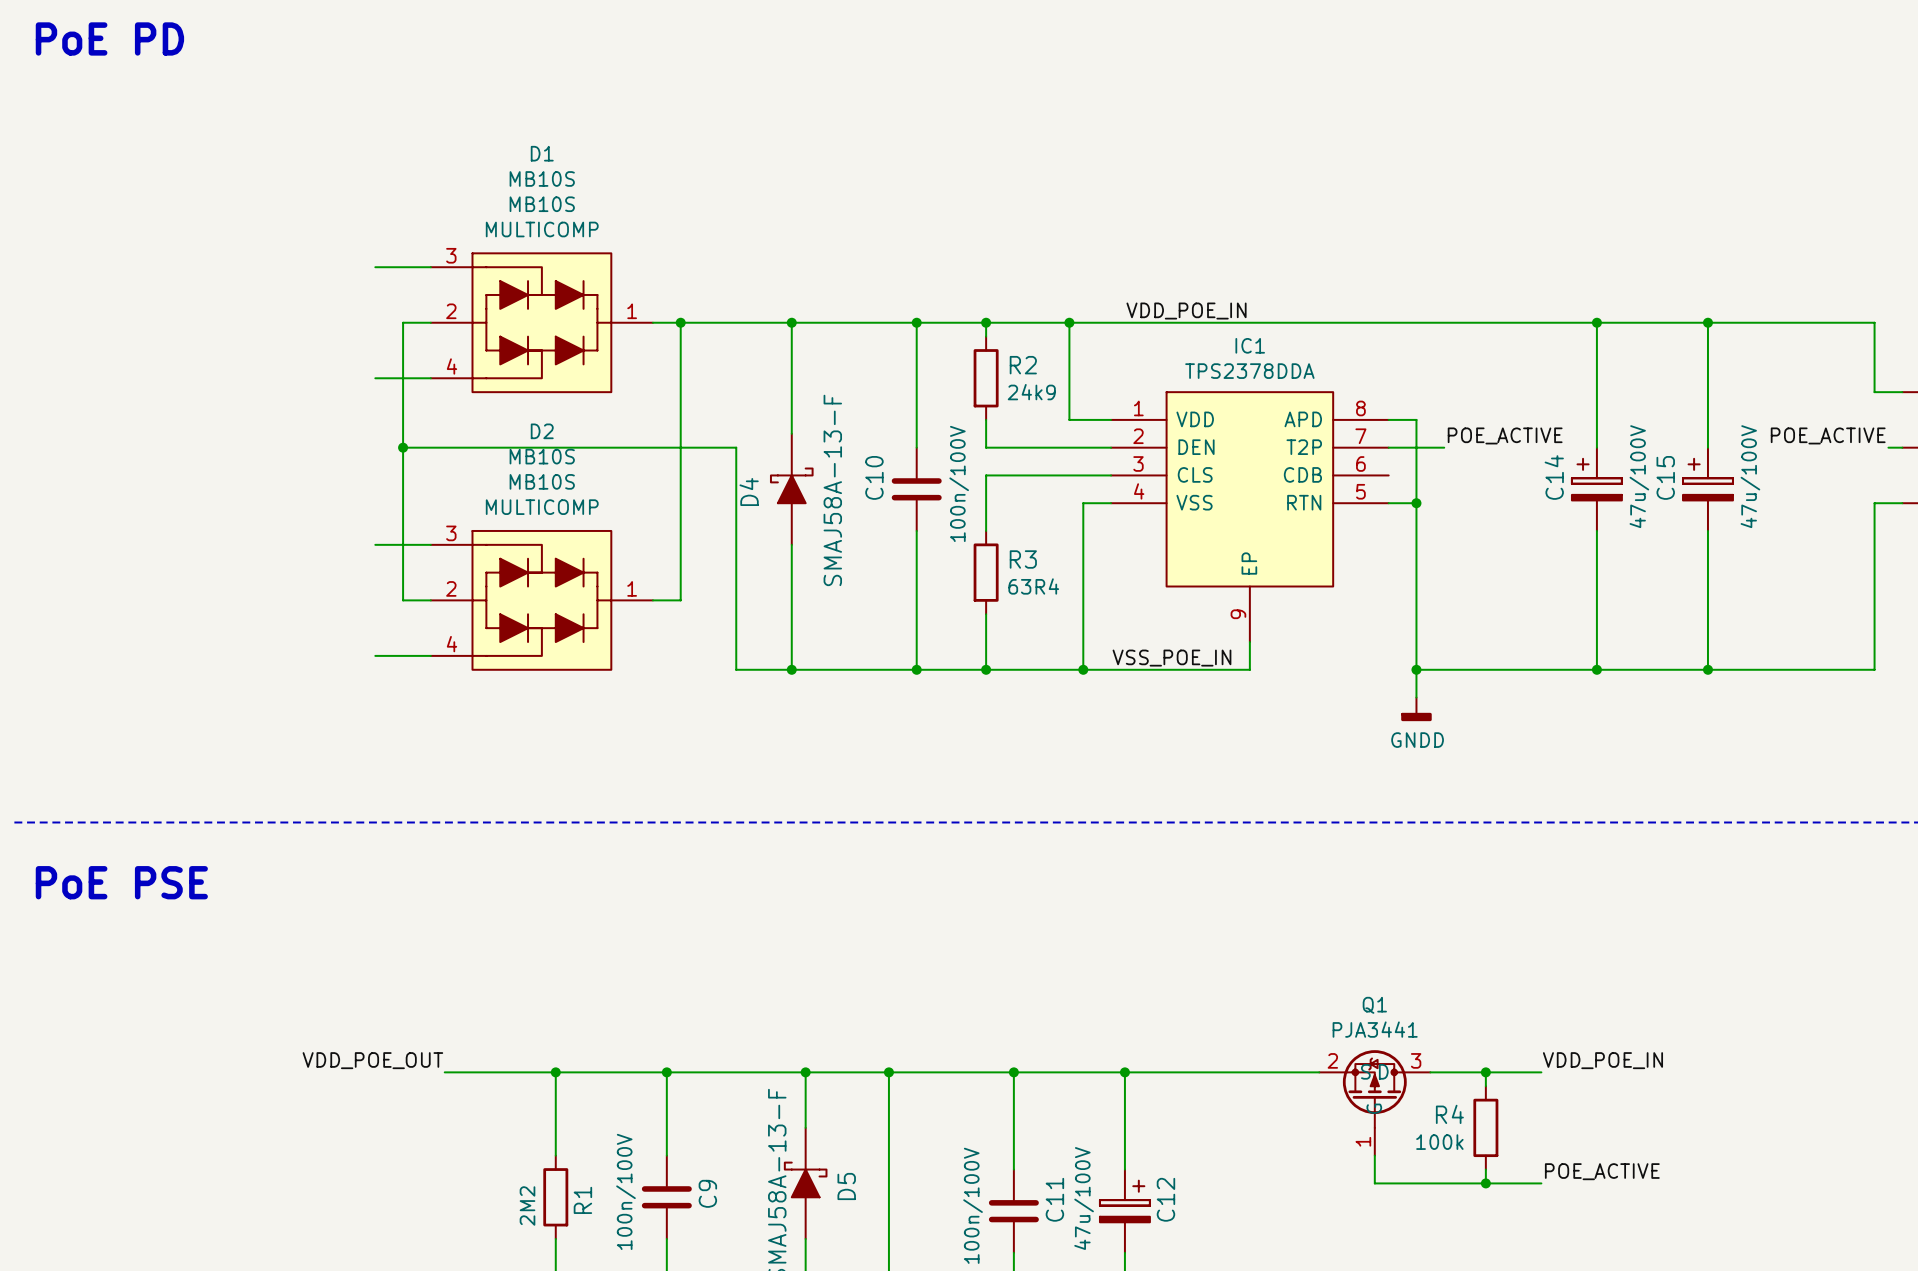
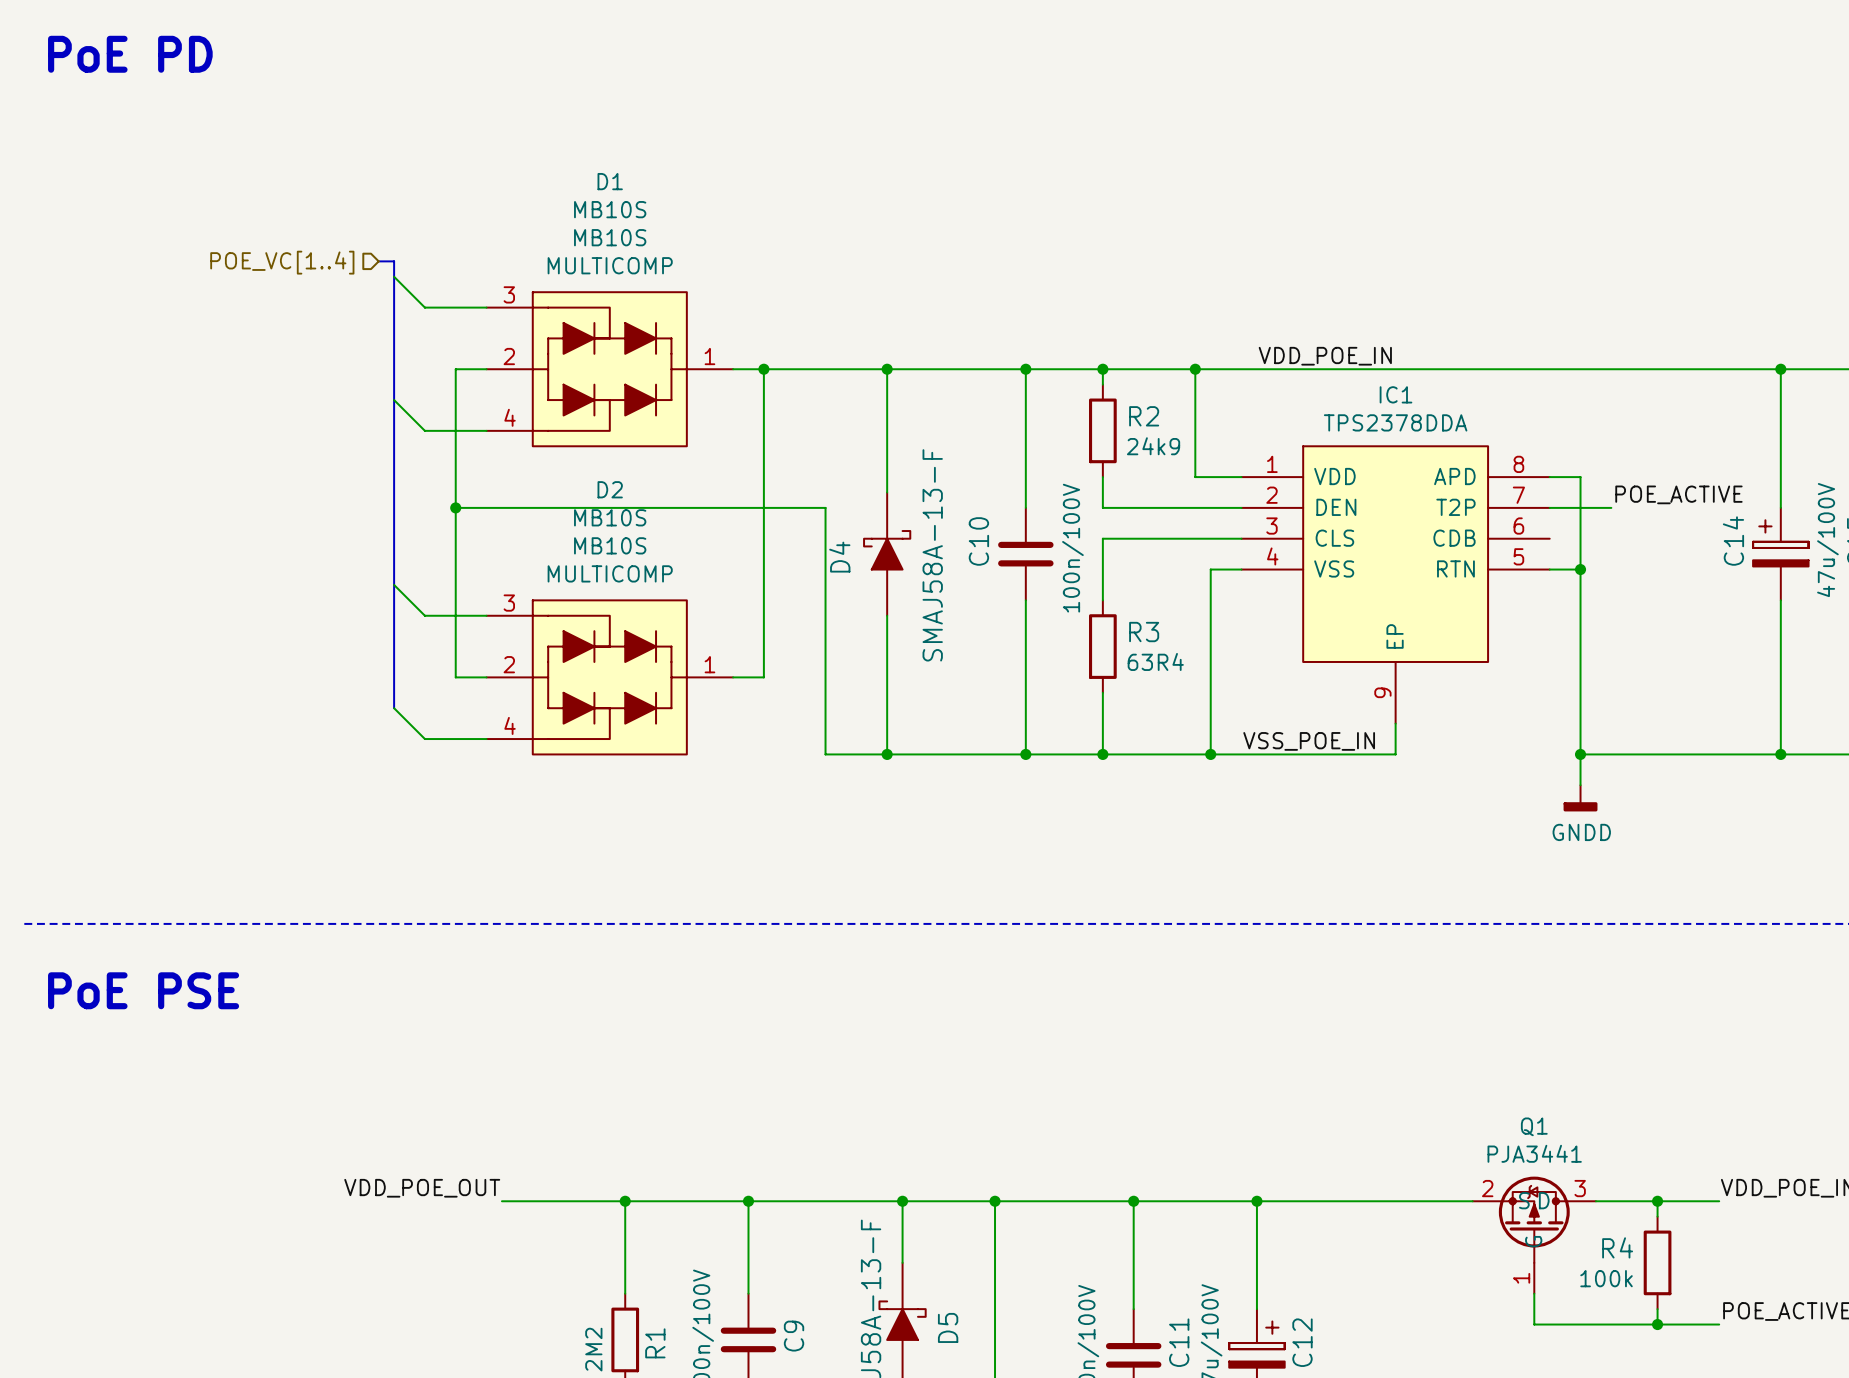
bus: none -> (378, 261) (394, 261) (394, 708)
hierarchical label: none -> POE_VC[1..4] (282, 262)
wire: none -> (394, 276) (424, 307)
wire: none -> (394, 400) (424, 430)
wire: none -> (394, 584) (424, 615)
wire: none -> (394, 708) (424, 739)

